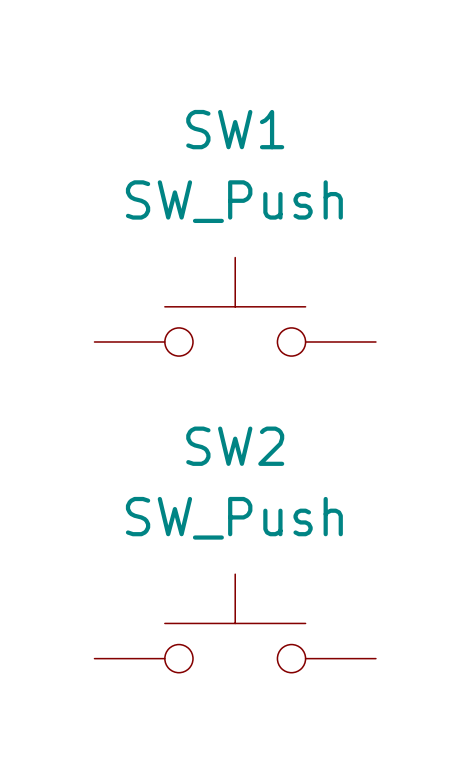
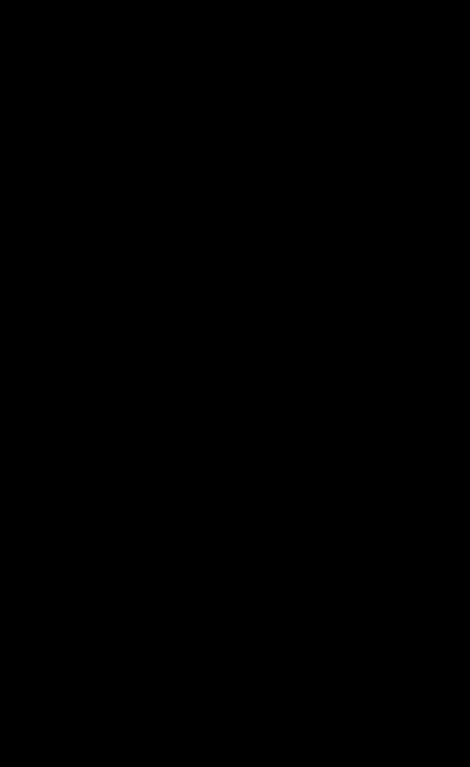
SW1: SW_Push (235, 306) -> none
SW2: SW_Push (235, 623) -> none

